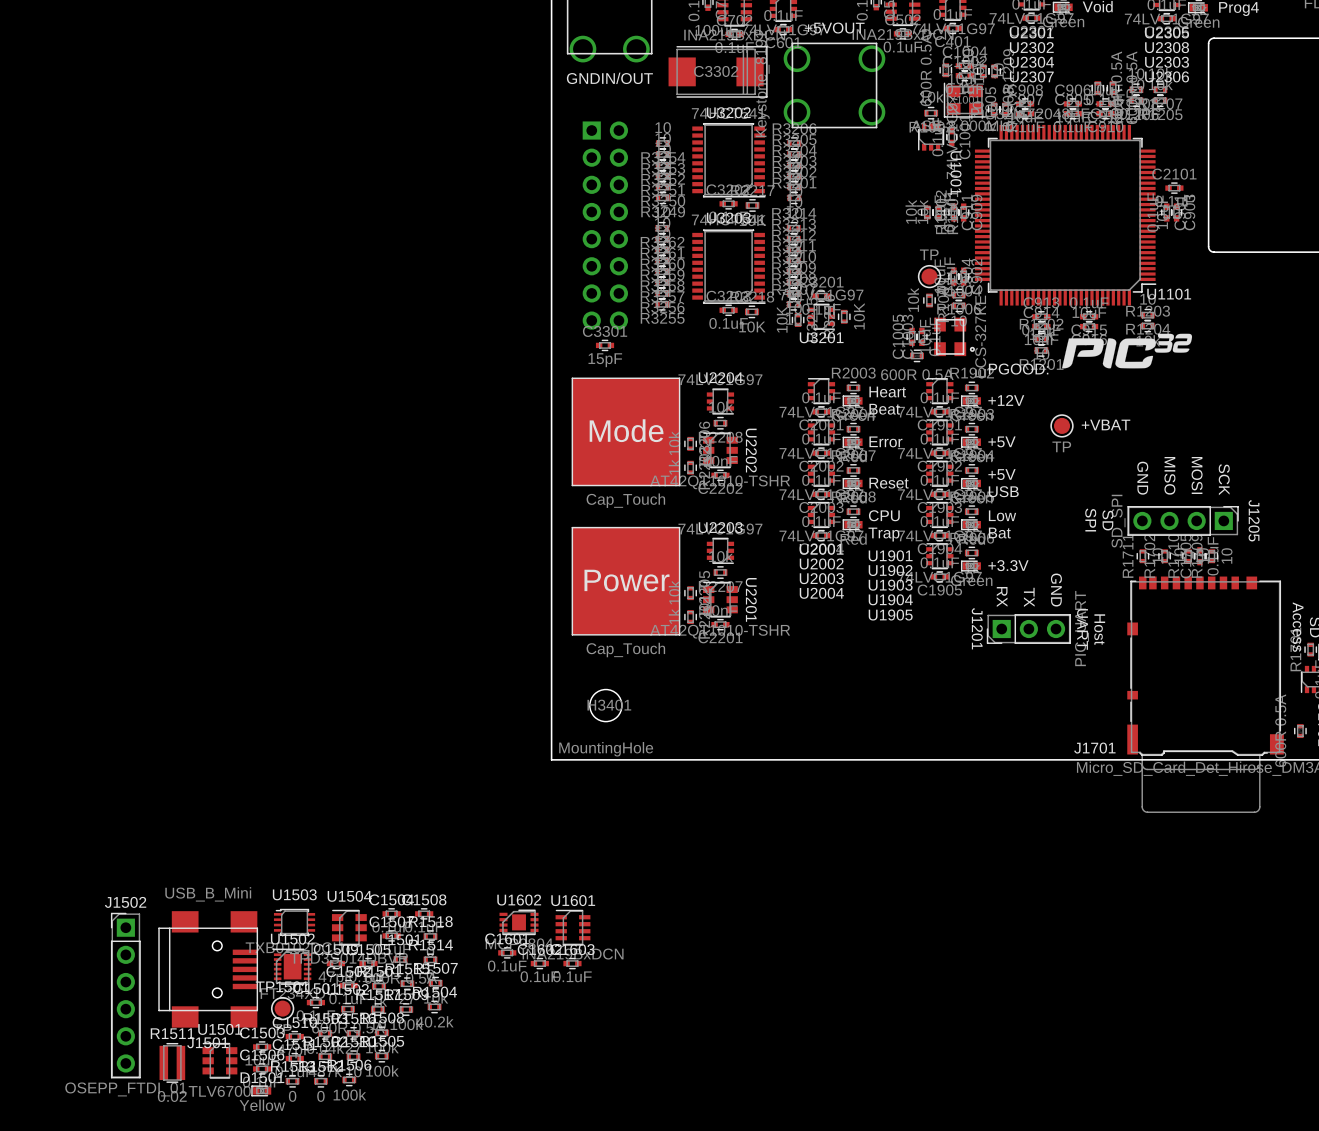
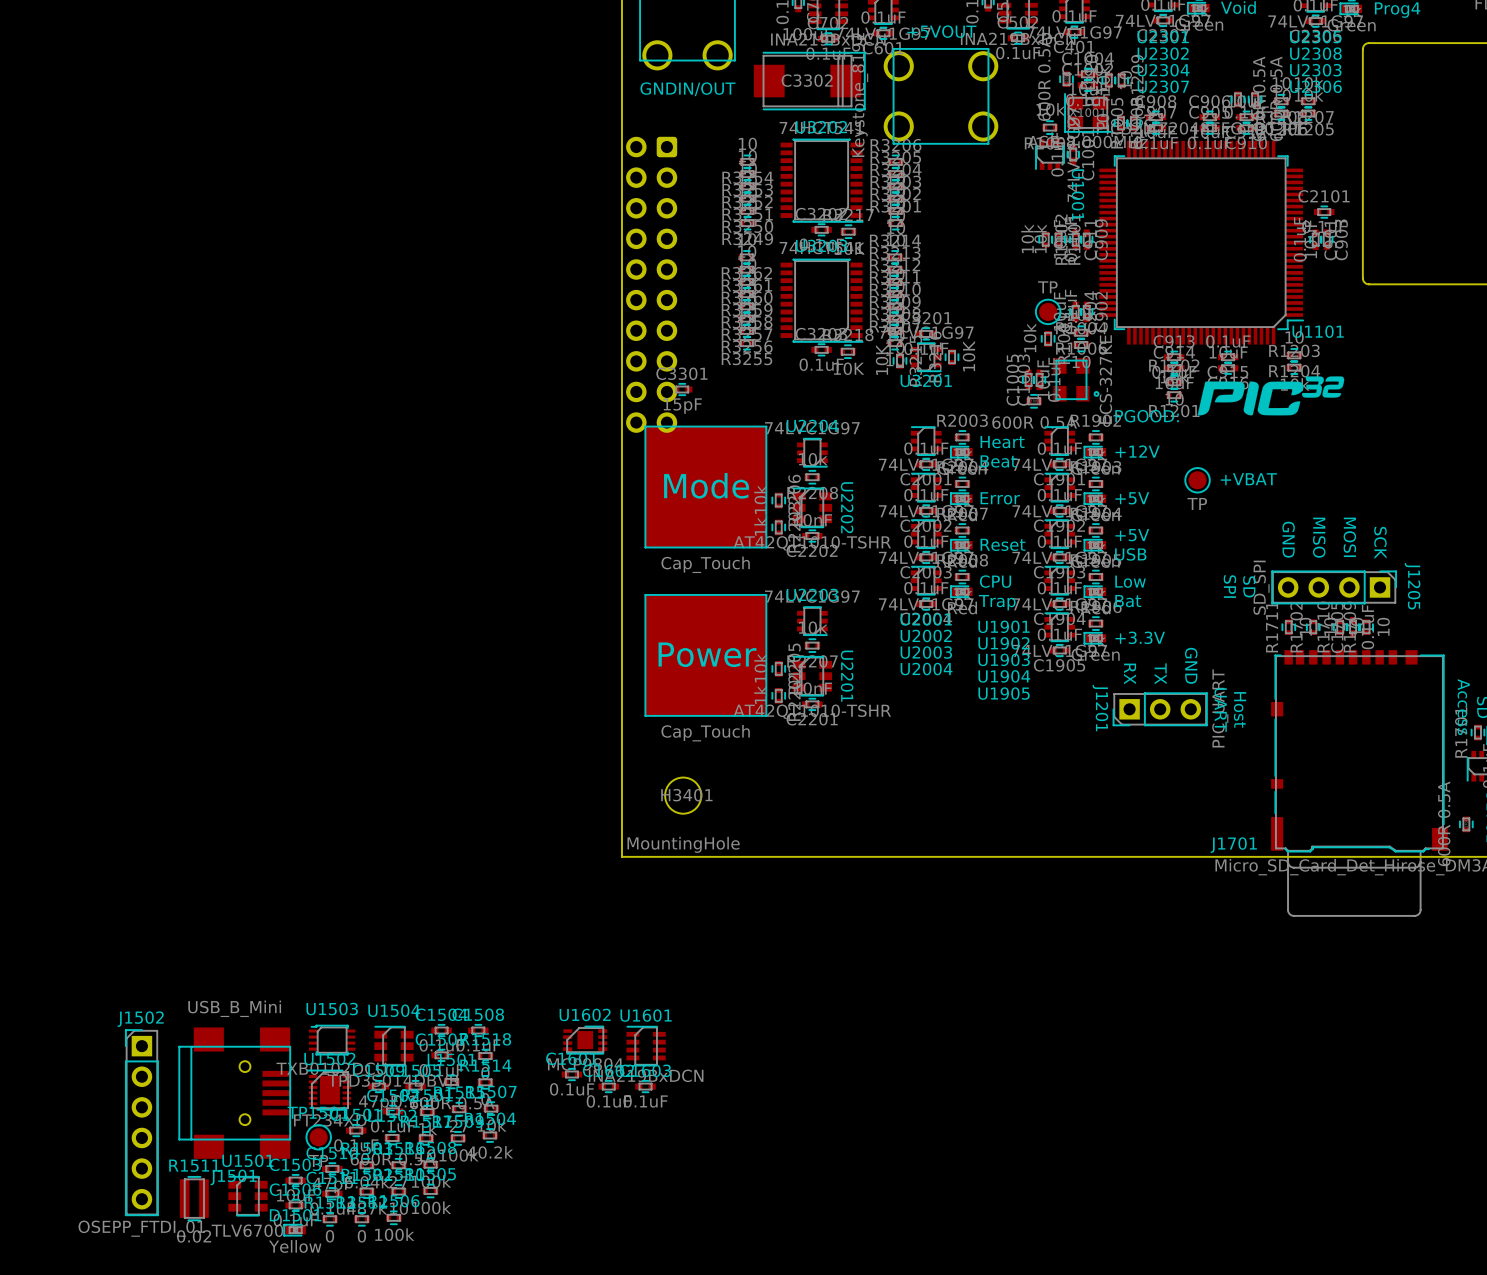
part: (605, 225) -> none
part: none -> (651, 284)

